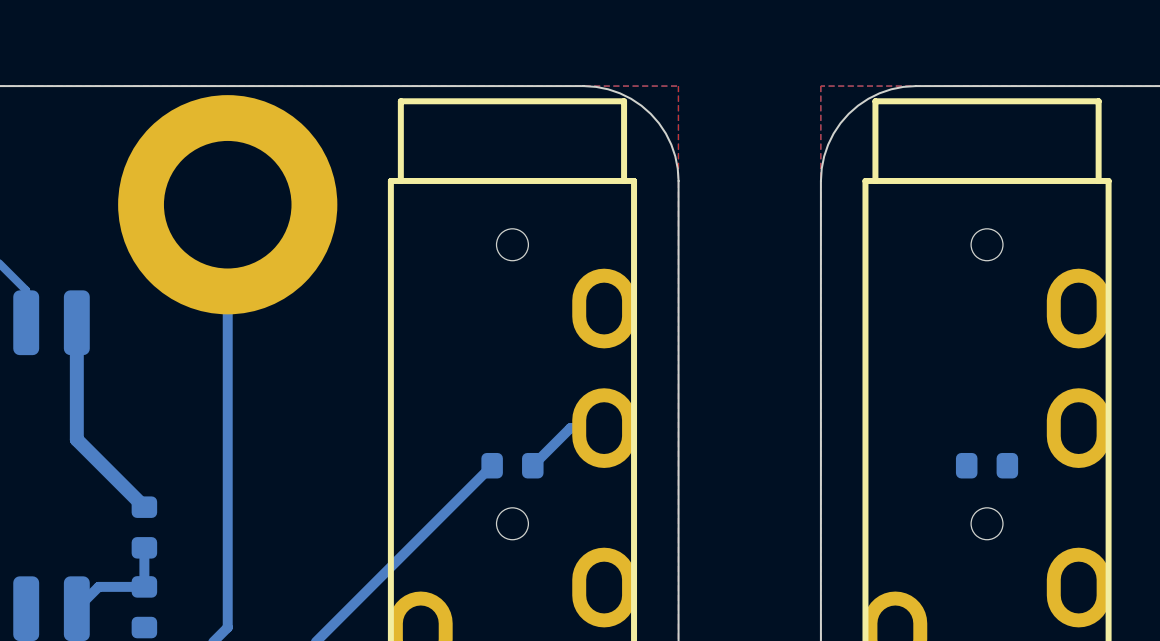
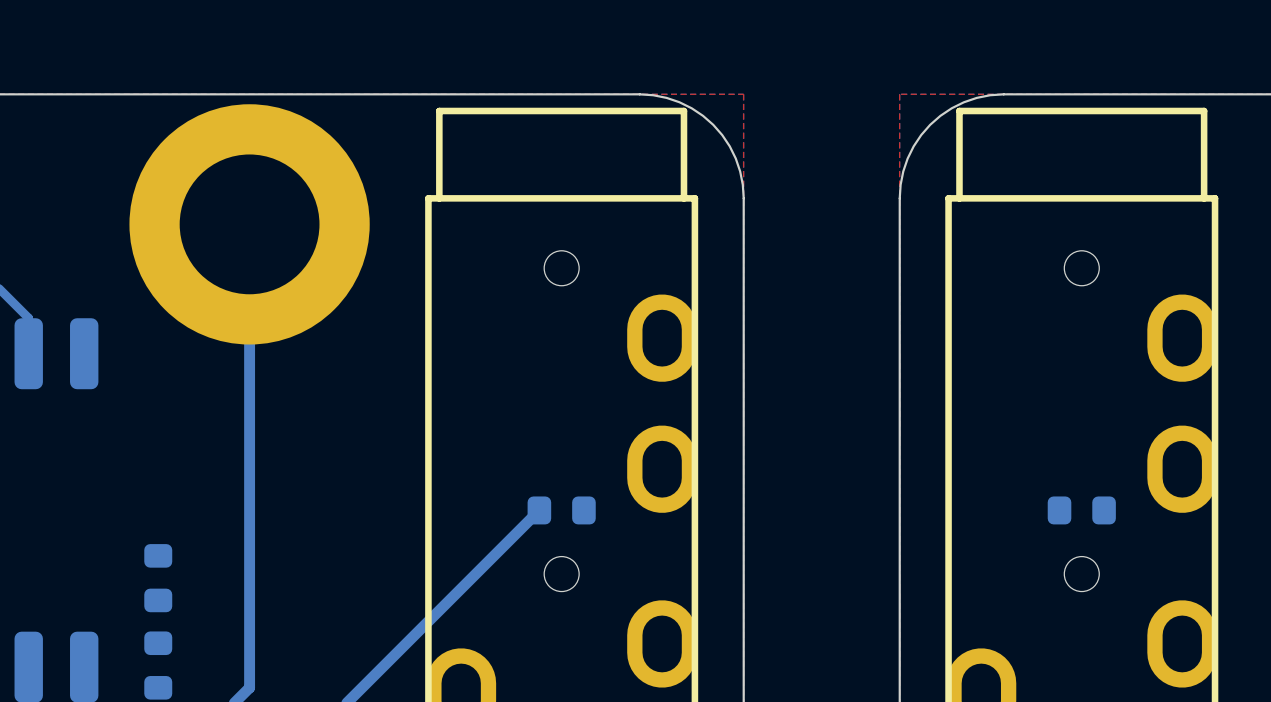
bottom track: (76, 322) (76, 439) (144, 507) -> none
bottom track: (604, 428) (570, 428) (532, 465) -> none
bottom track: (144, 547) (144, 586) (98, 586) (76, 608) -> none

